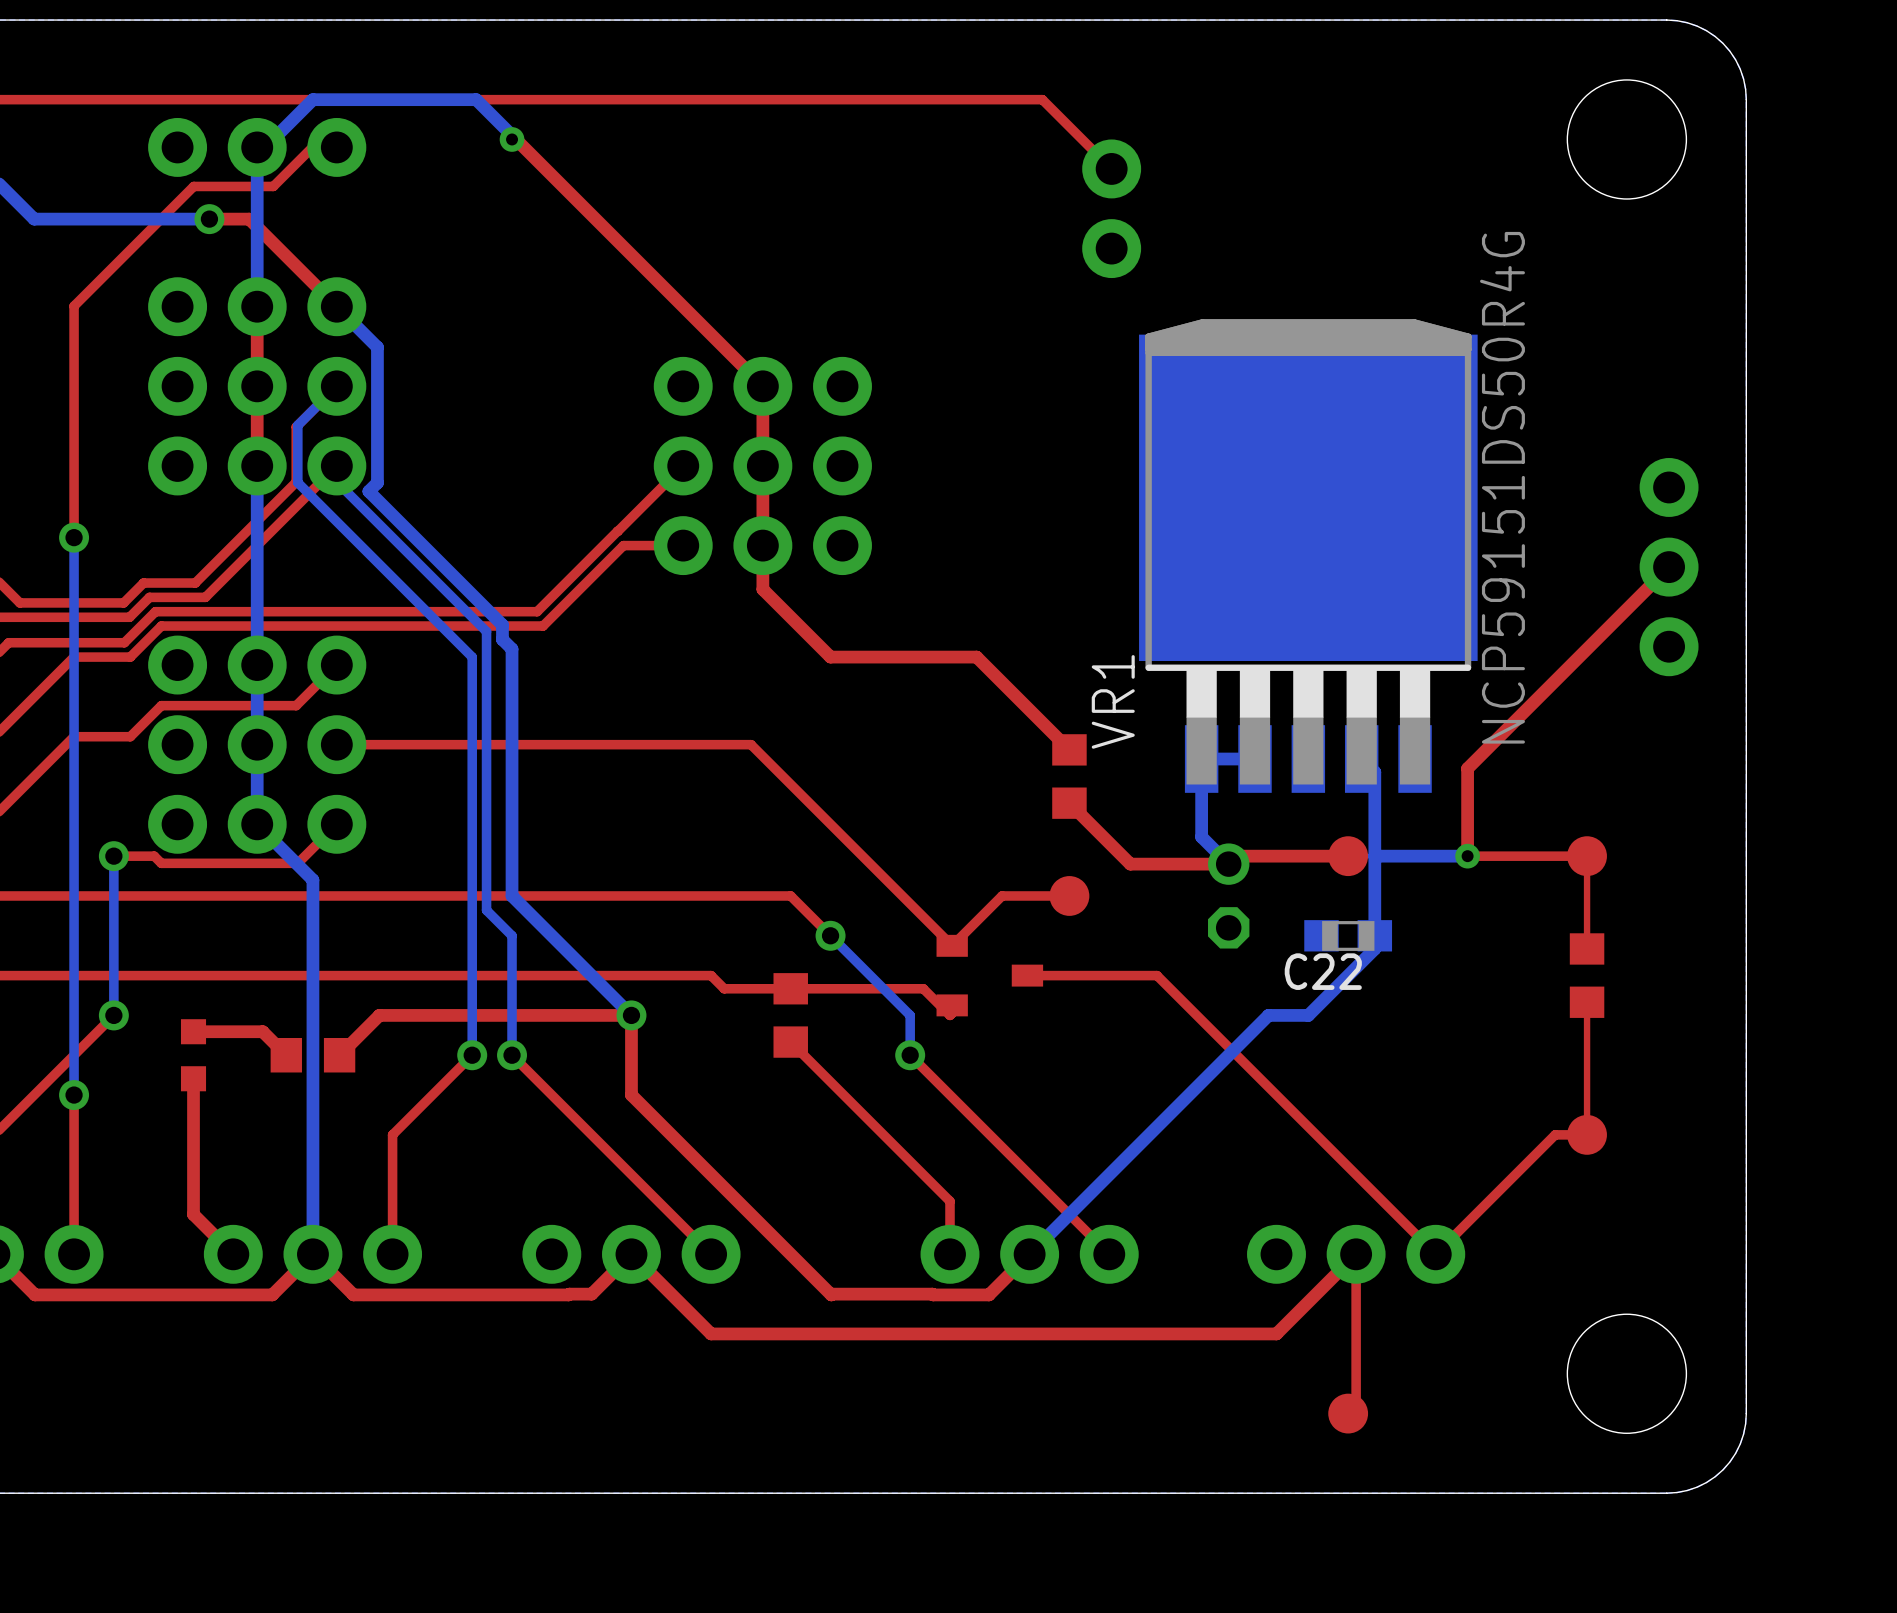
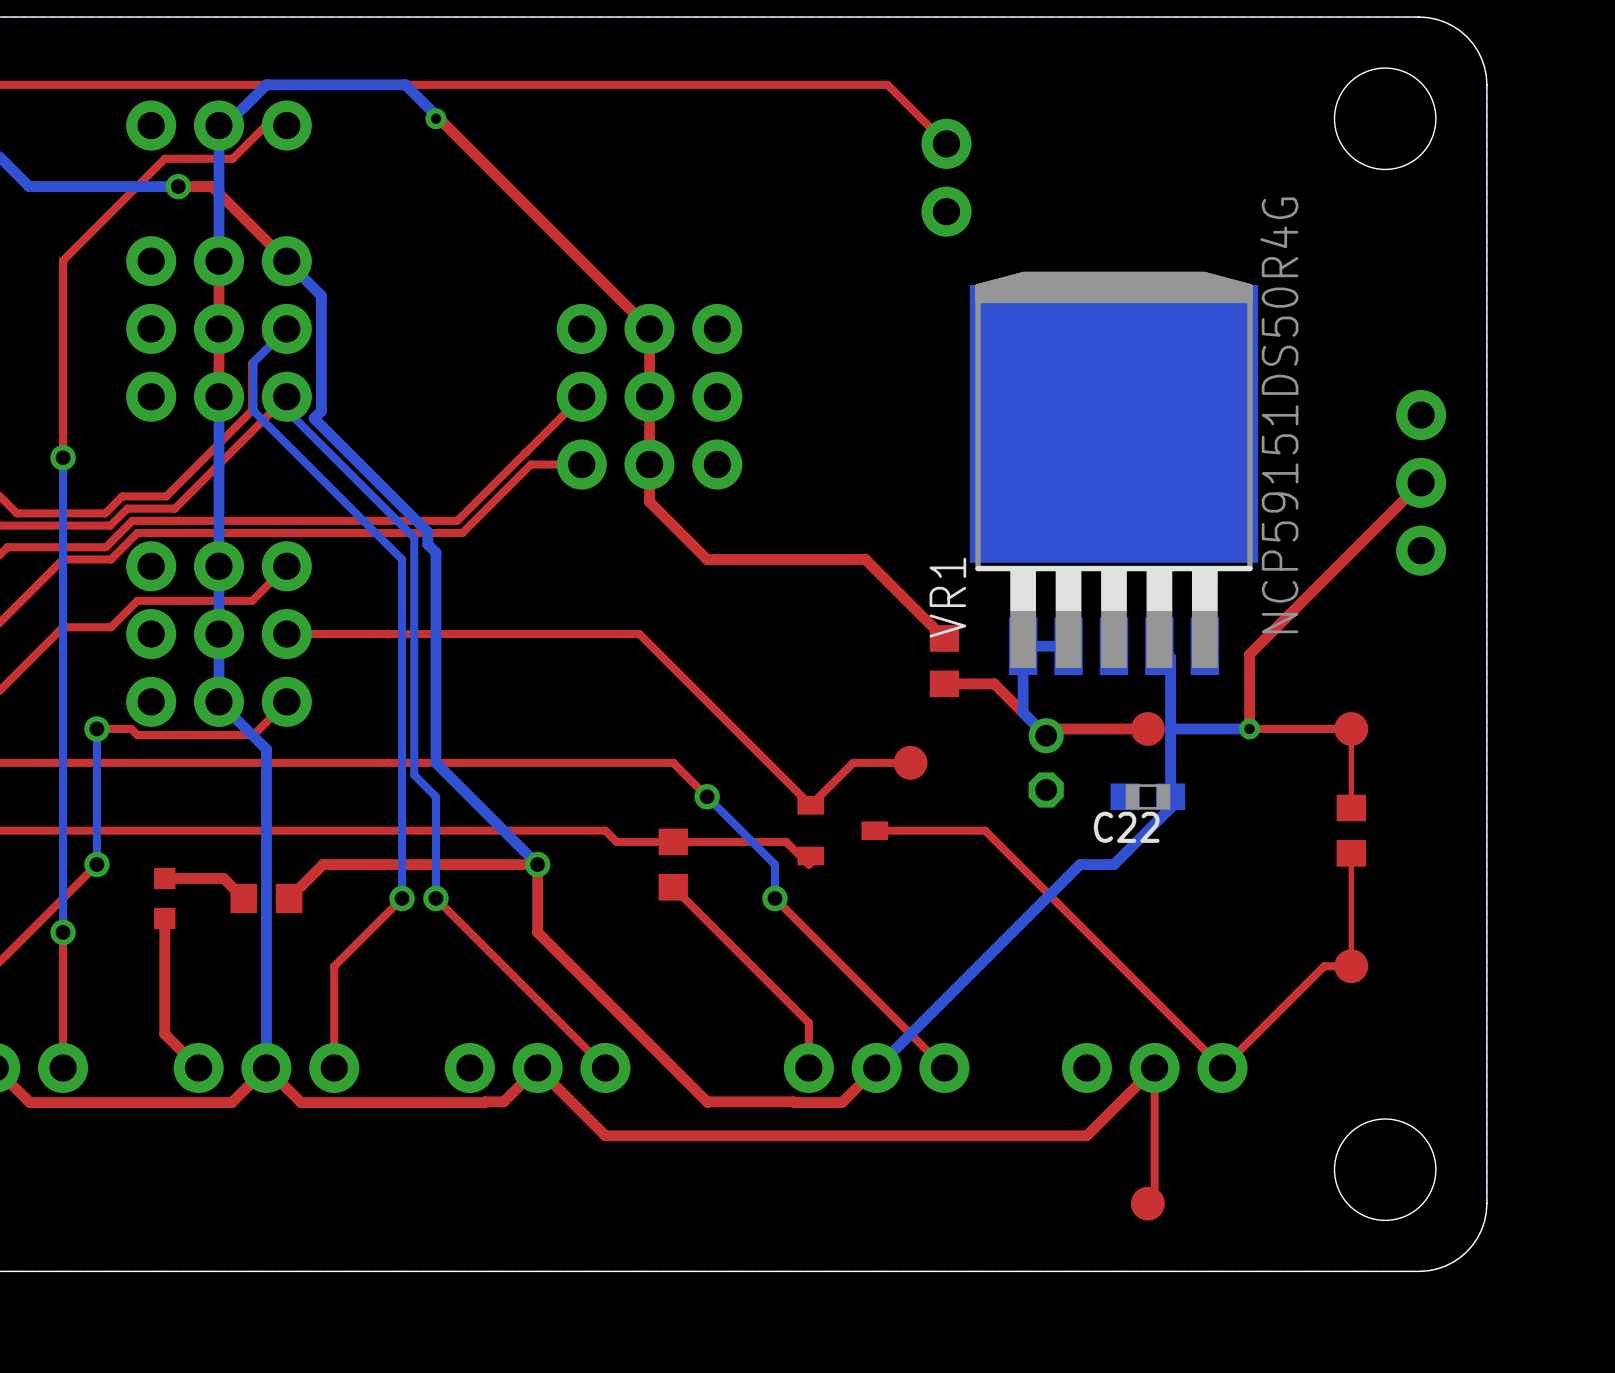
top track: (976, 657) (1069, 749) -> (831, 559) (865, 559) (944, 638)
part position: (1069, 776) -> (944, 661)
top track: (1069, 803) (1130, 864) (1228, 864) -> (944, 683) (994, 683) (1046, 735)

